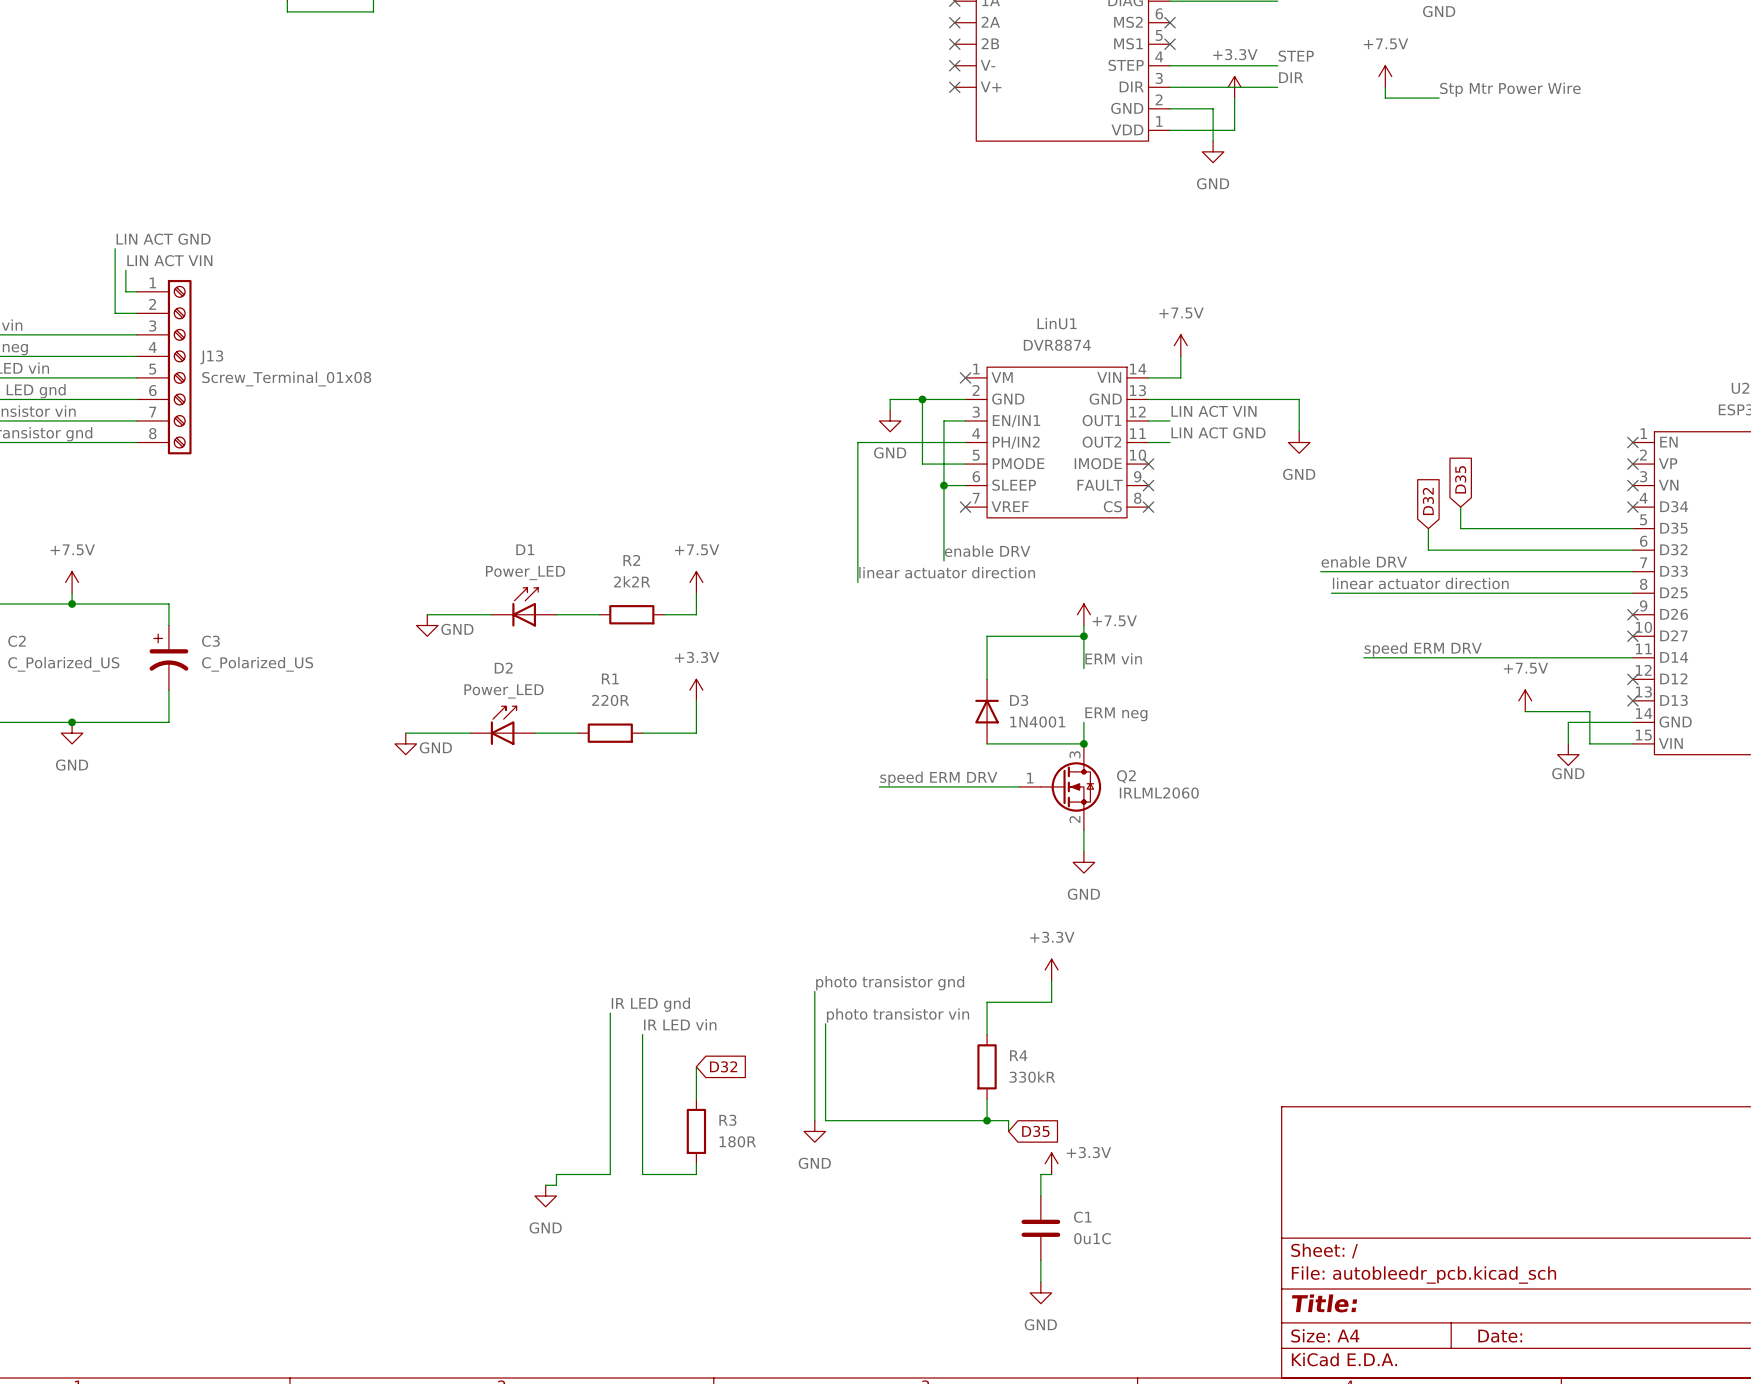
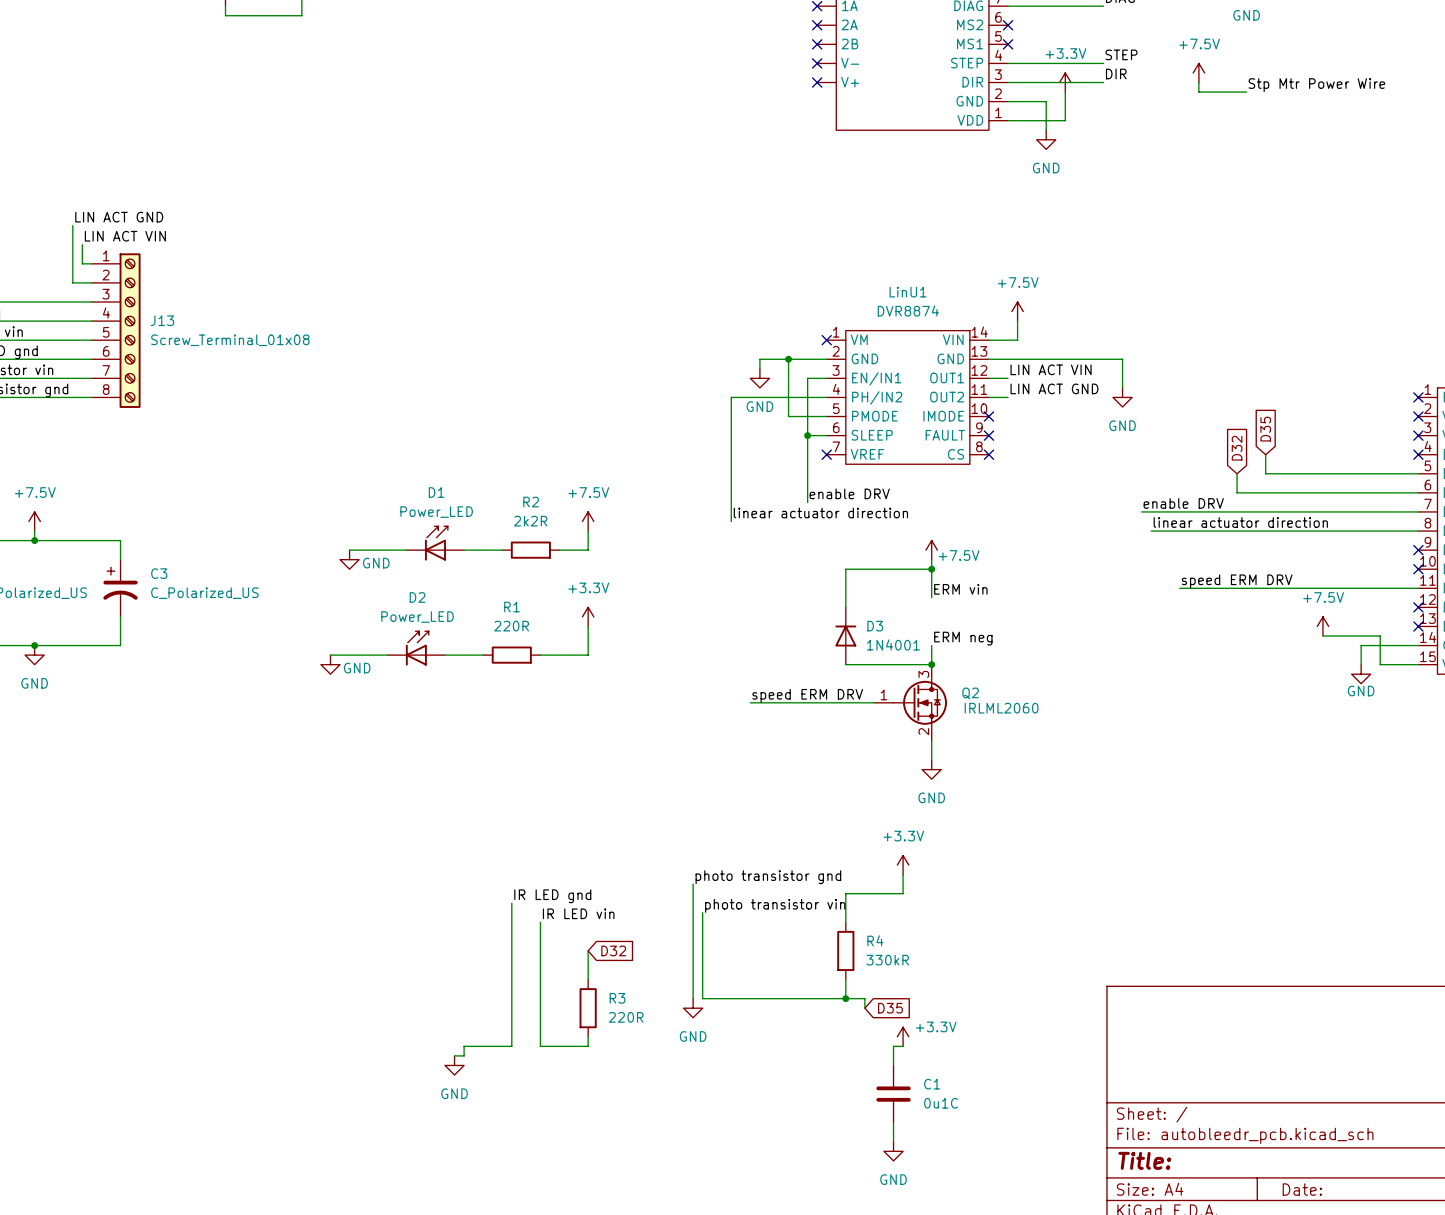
R3 value: 180R (737, 1141) -> 220R (626, 1017)

